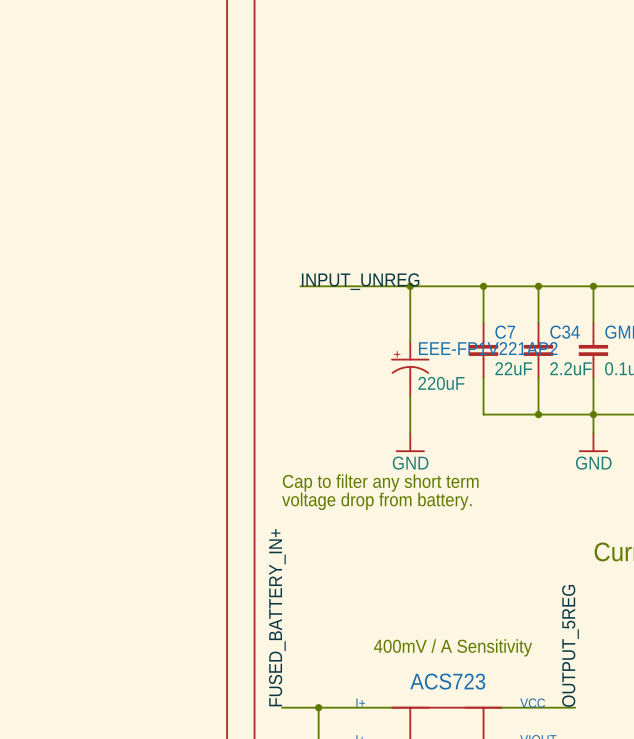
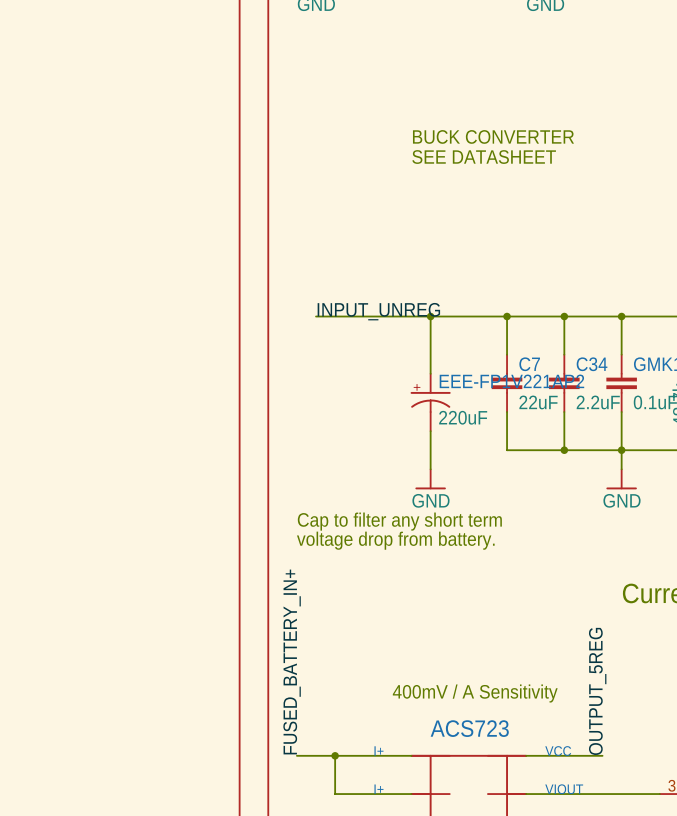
text: none -> BUCK CONVERTER (493, 136)
text: none -> SEE DATASHEET (484, 157)

